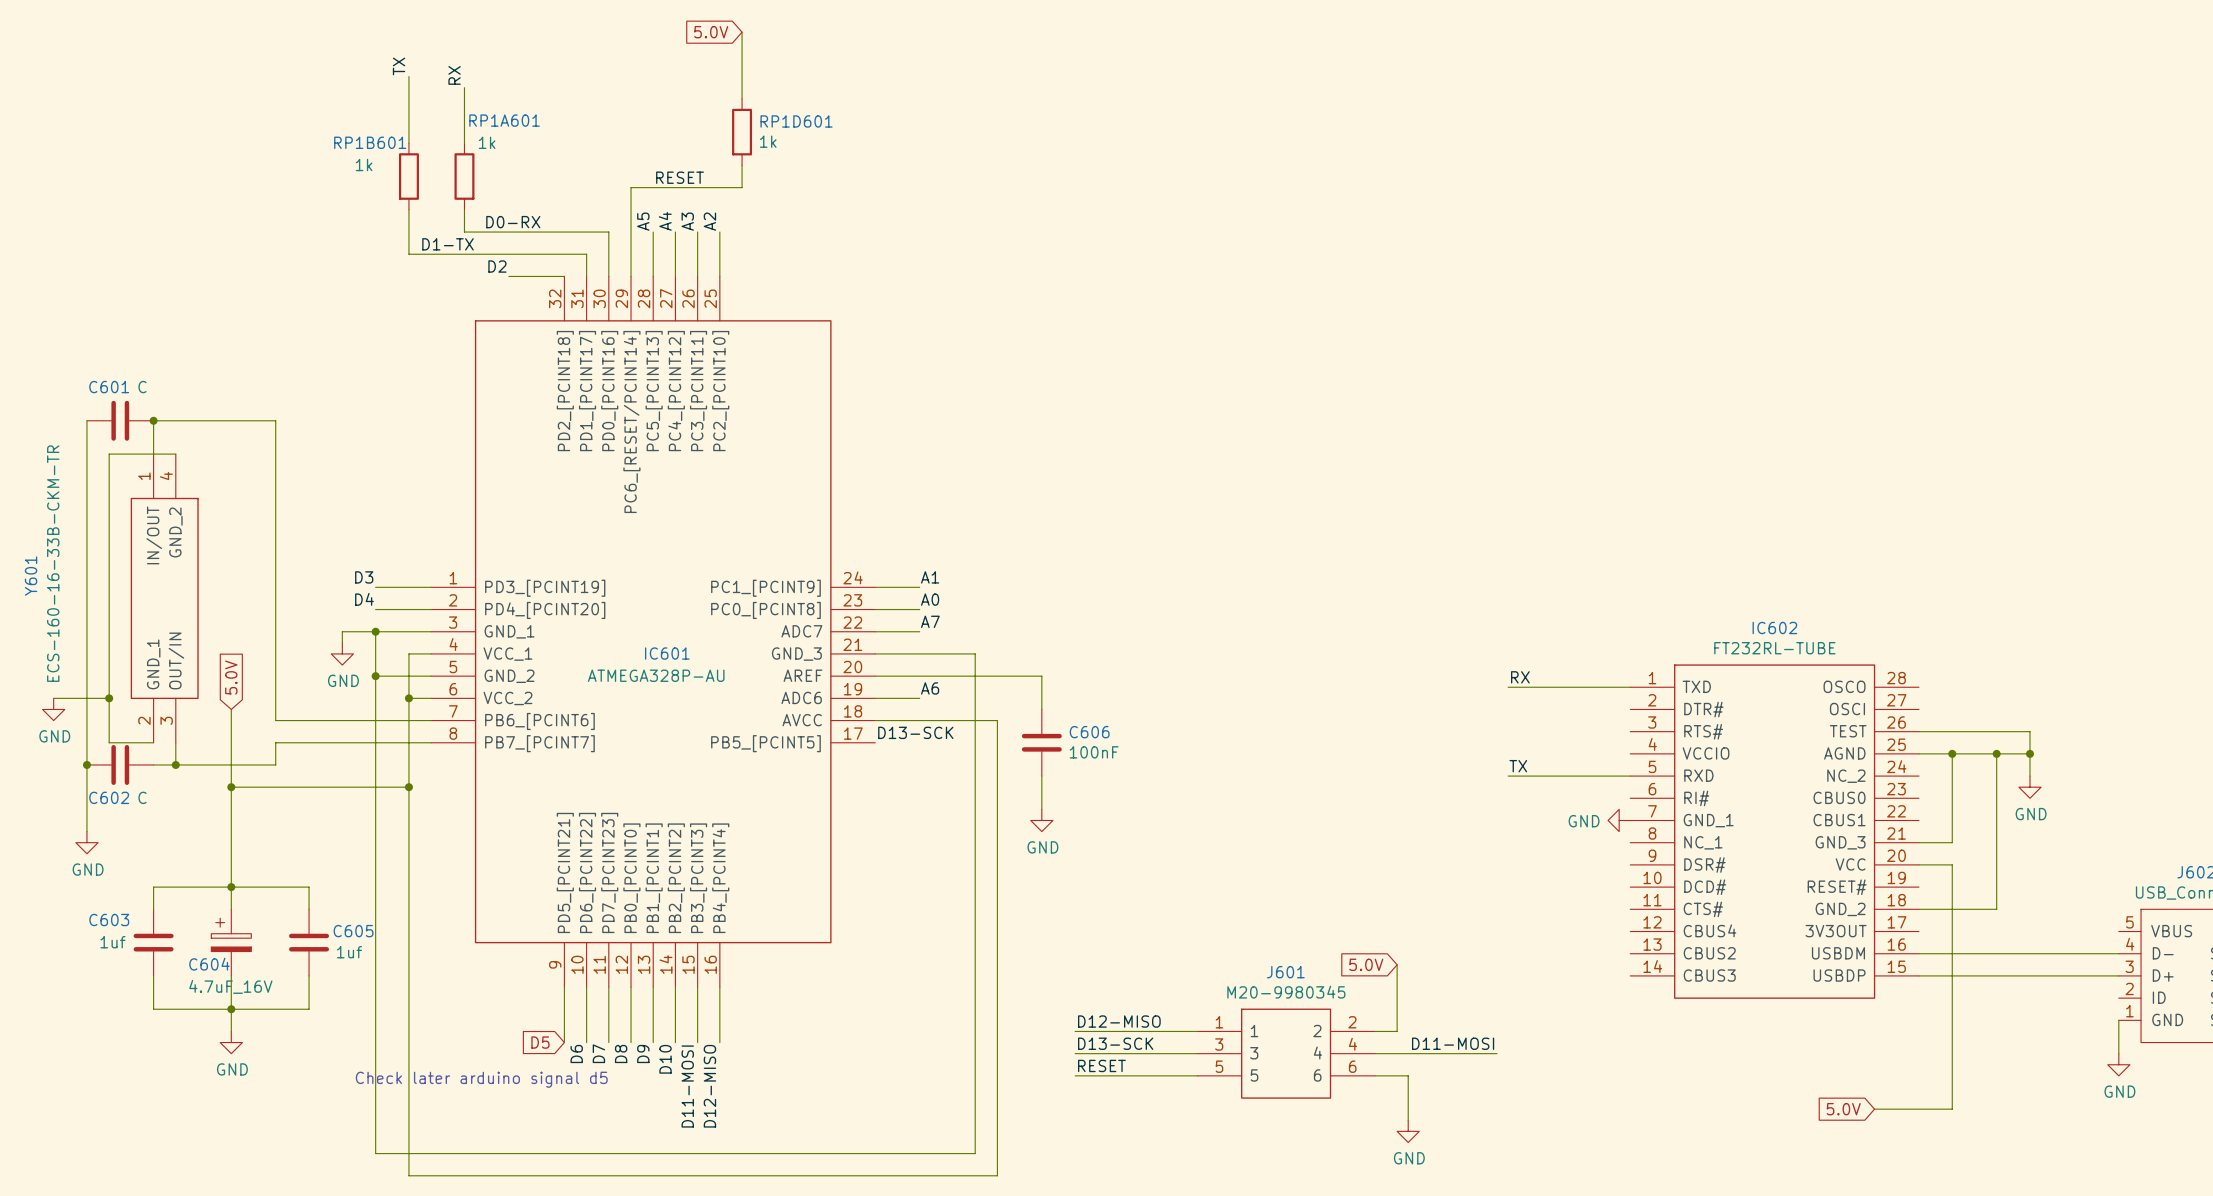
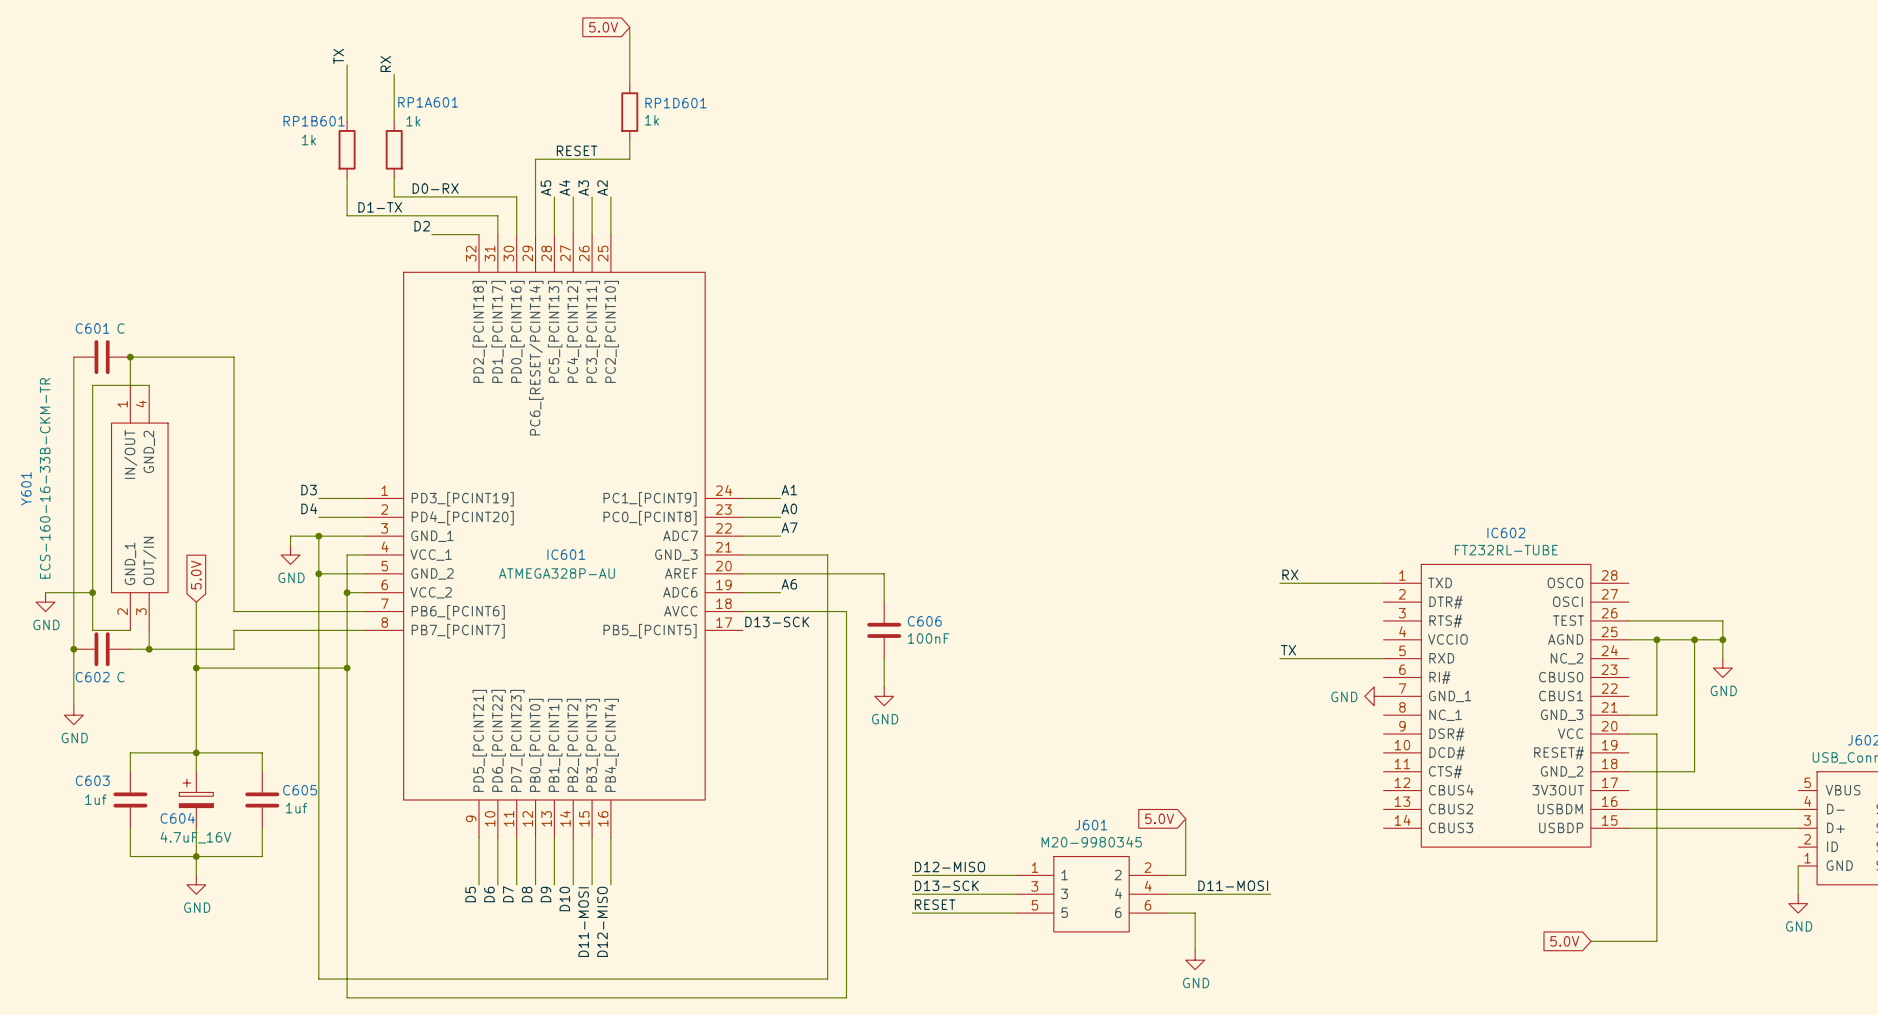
global label: D5 (540, 1042) -> none
label: none -> D5 (470, 894)
text: Check later arduino signal d5 (481, 1079) -> none

